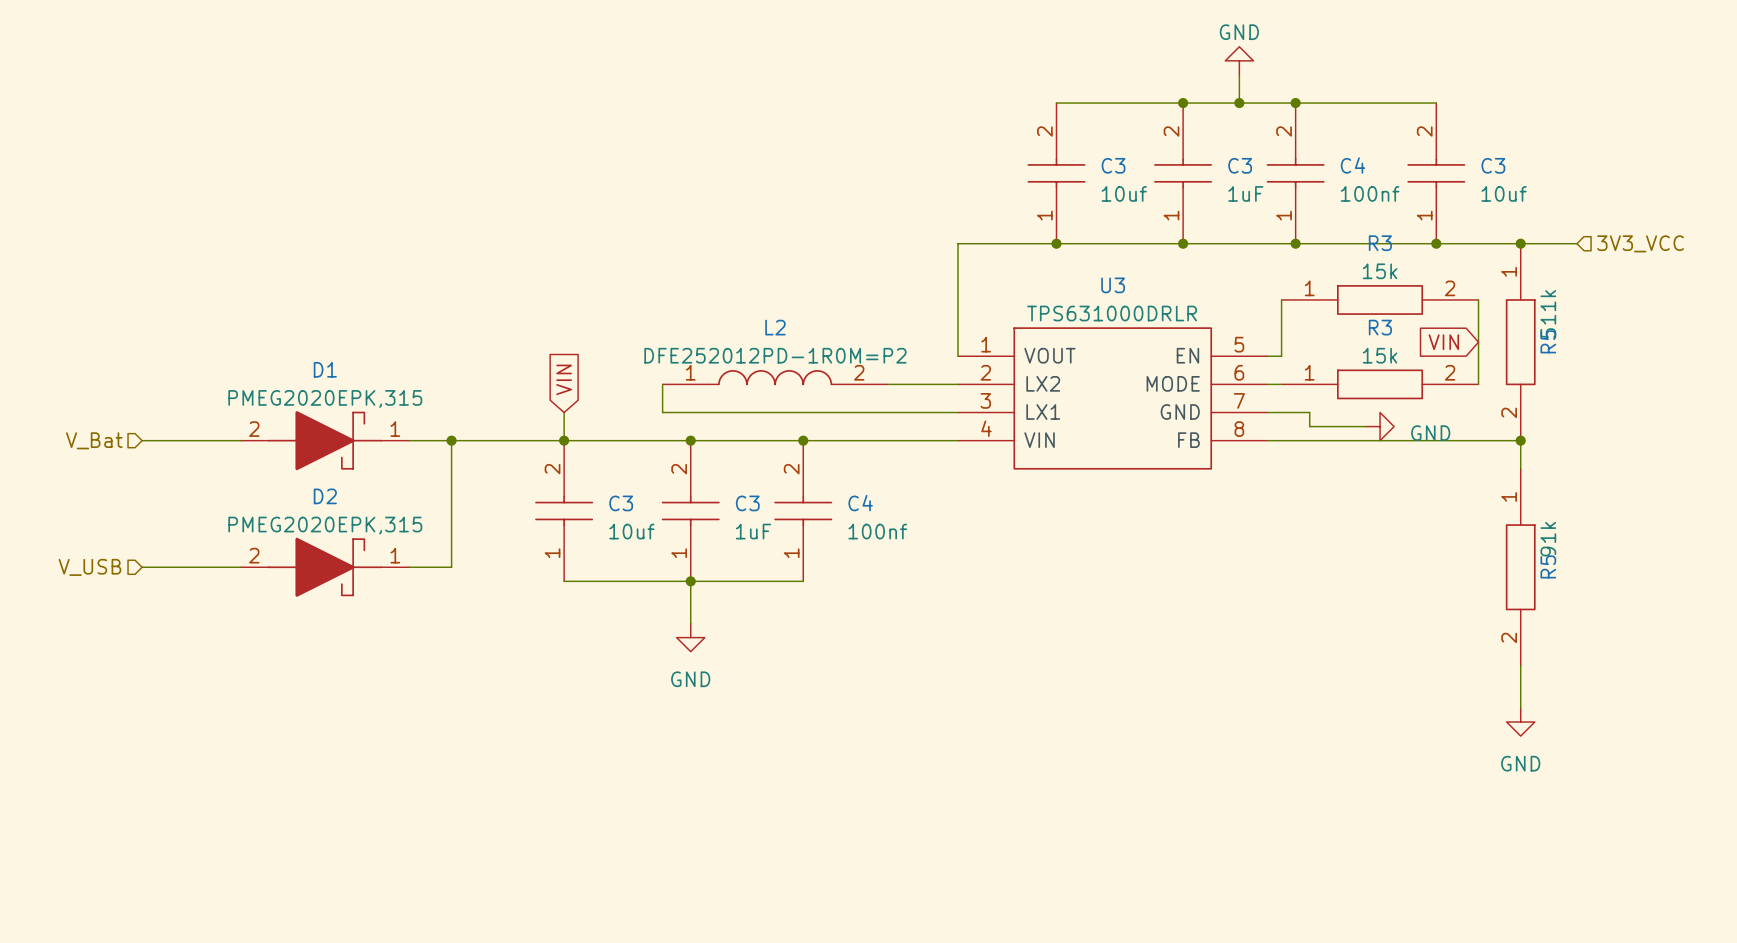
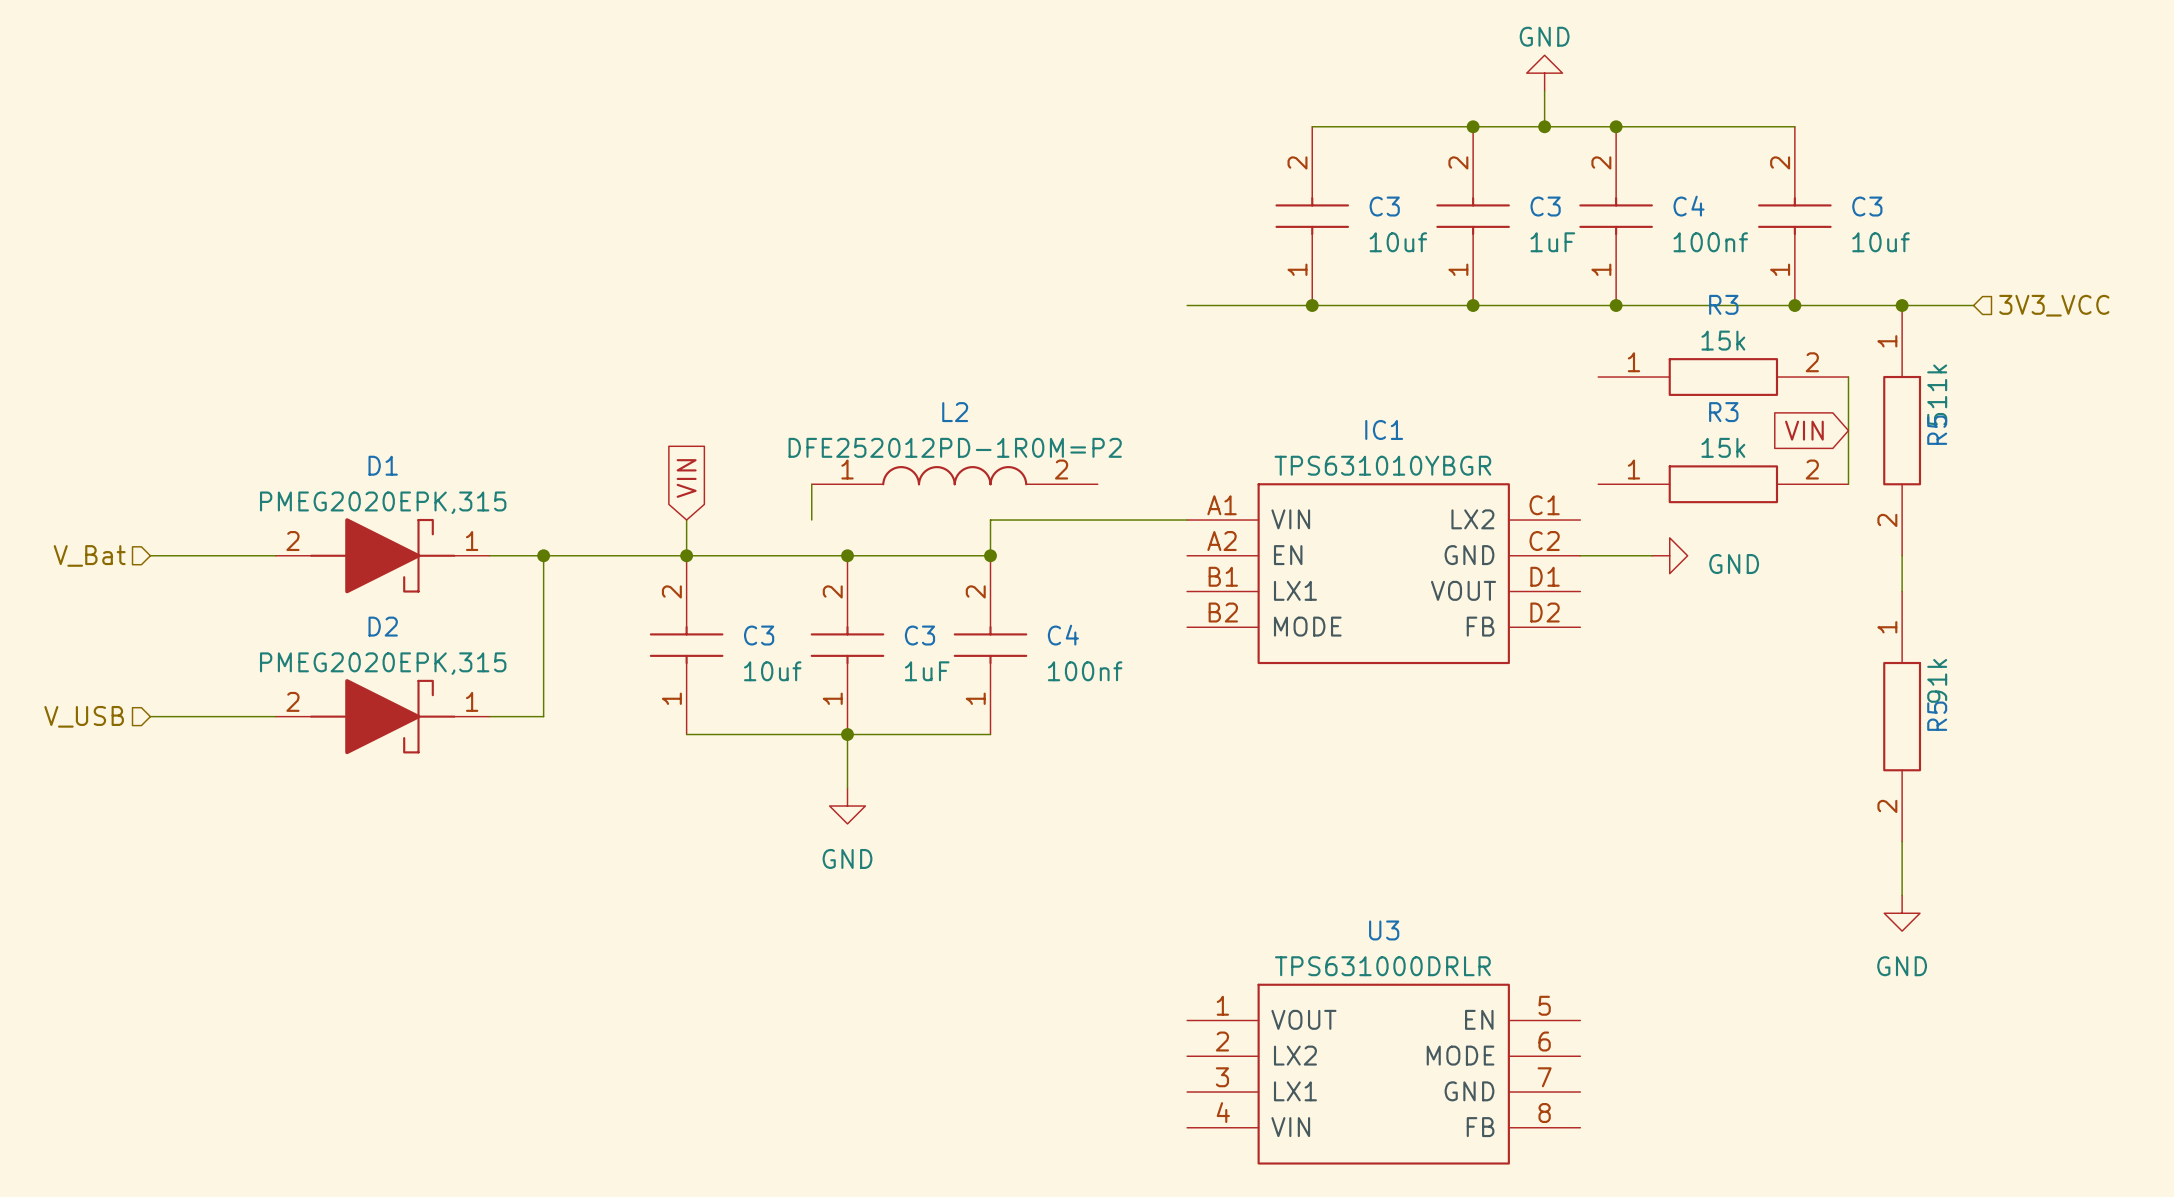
wire: (958, 243) (958, 356) -> none
wire: (1281, 299) (1281, 356) (1267, 356) -> none
wire: (887, 384) (958, 384) -> none
wire: (1267, 384) (1281, 384) -> none
U3 position: (1112, 398) -> (1383, 1074)
wire: (662, 412) (803, 412) -> (990, 555) (990, 520)
wire: (1267, 412) (1309, 412) (1309, 426) (1365, 426) -> none
power symbol position: GND (1380, 426) -> GND (1669, 555)
wire: (803, 440) (958, 440) -> none
wire: (1323, 440) (1520, 440) -> none
junction: (1520, 440) -> none
IC1: none -> TPS631010YBGR (1383, 573)

